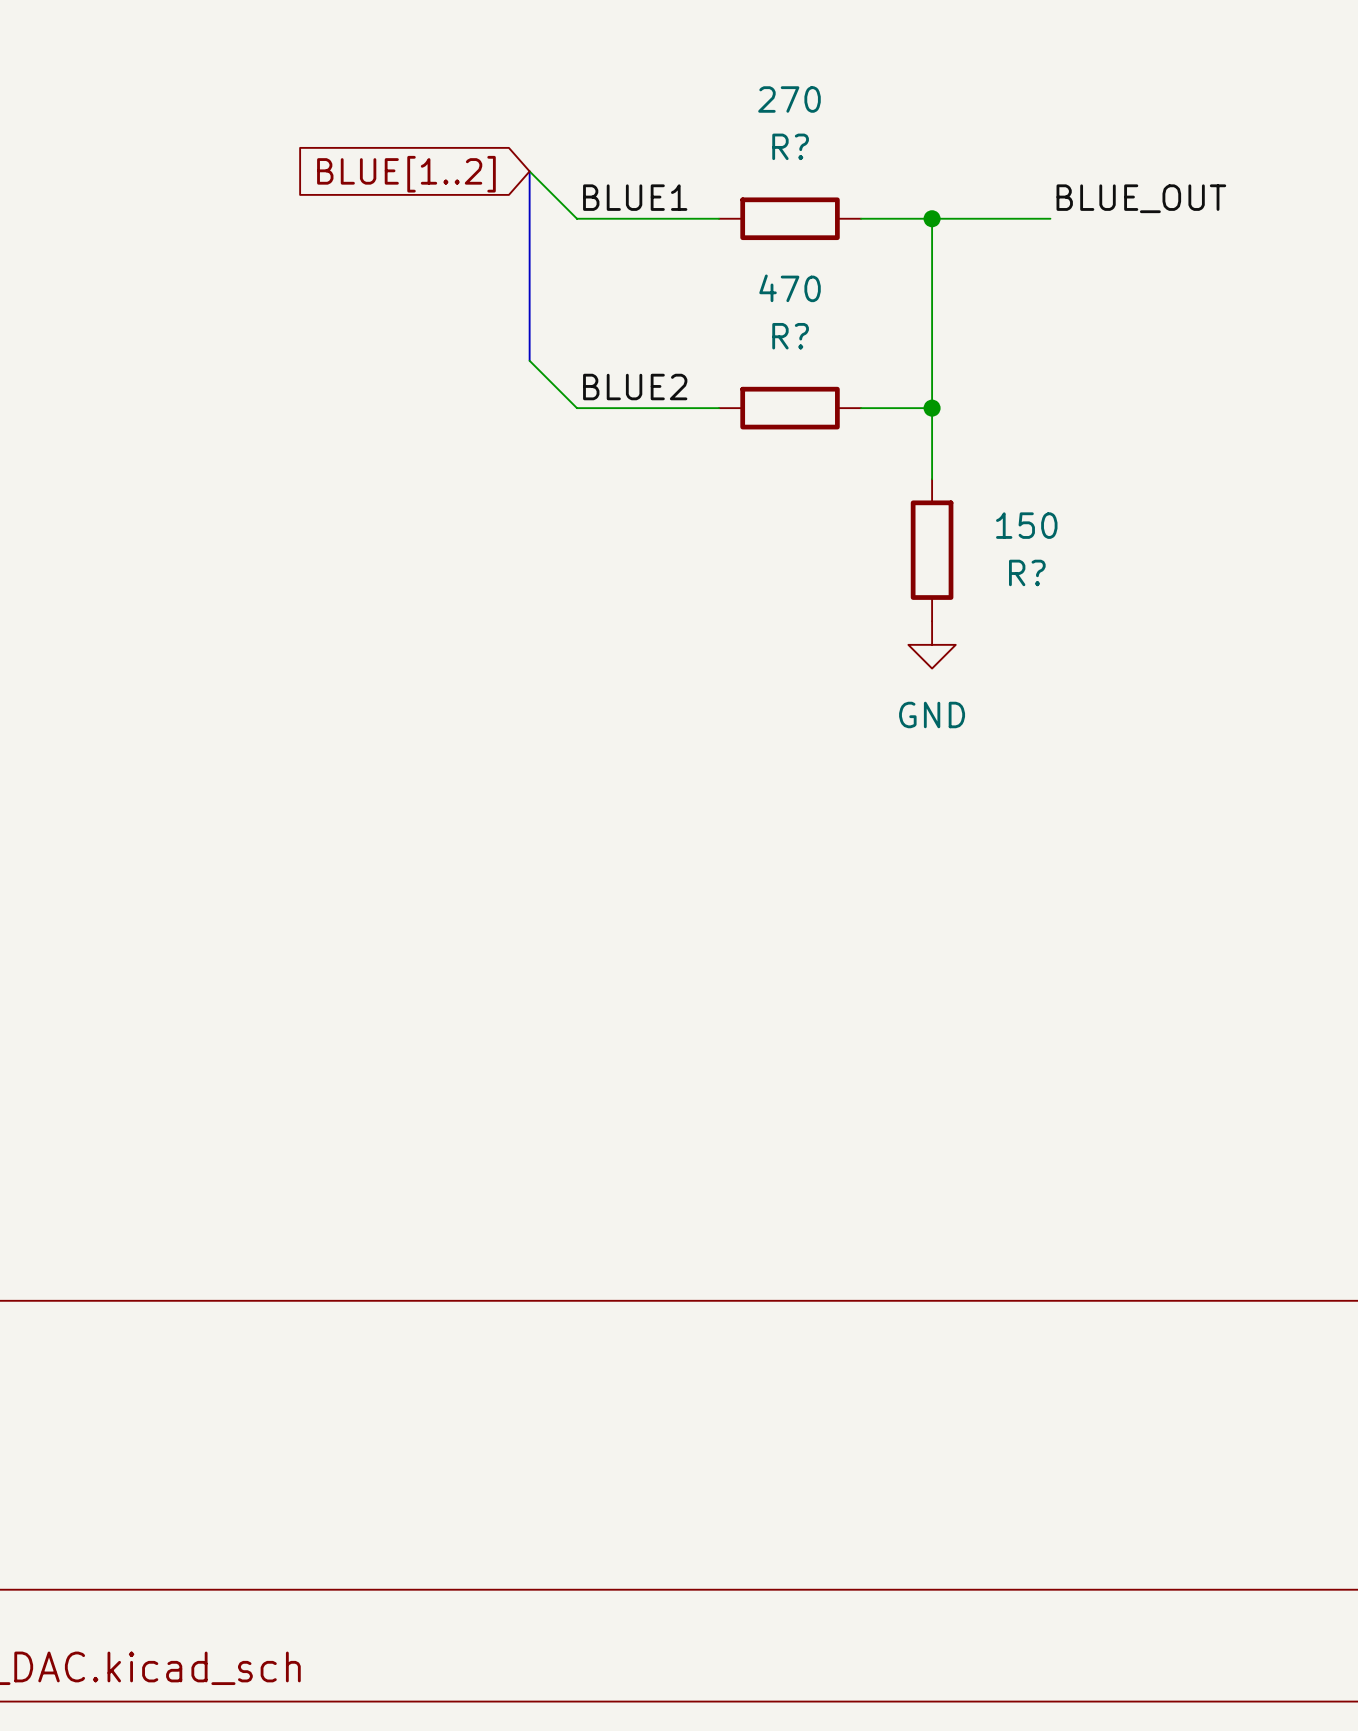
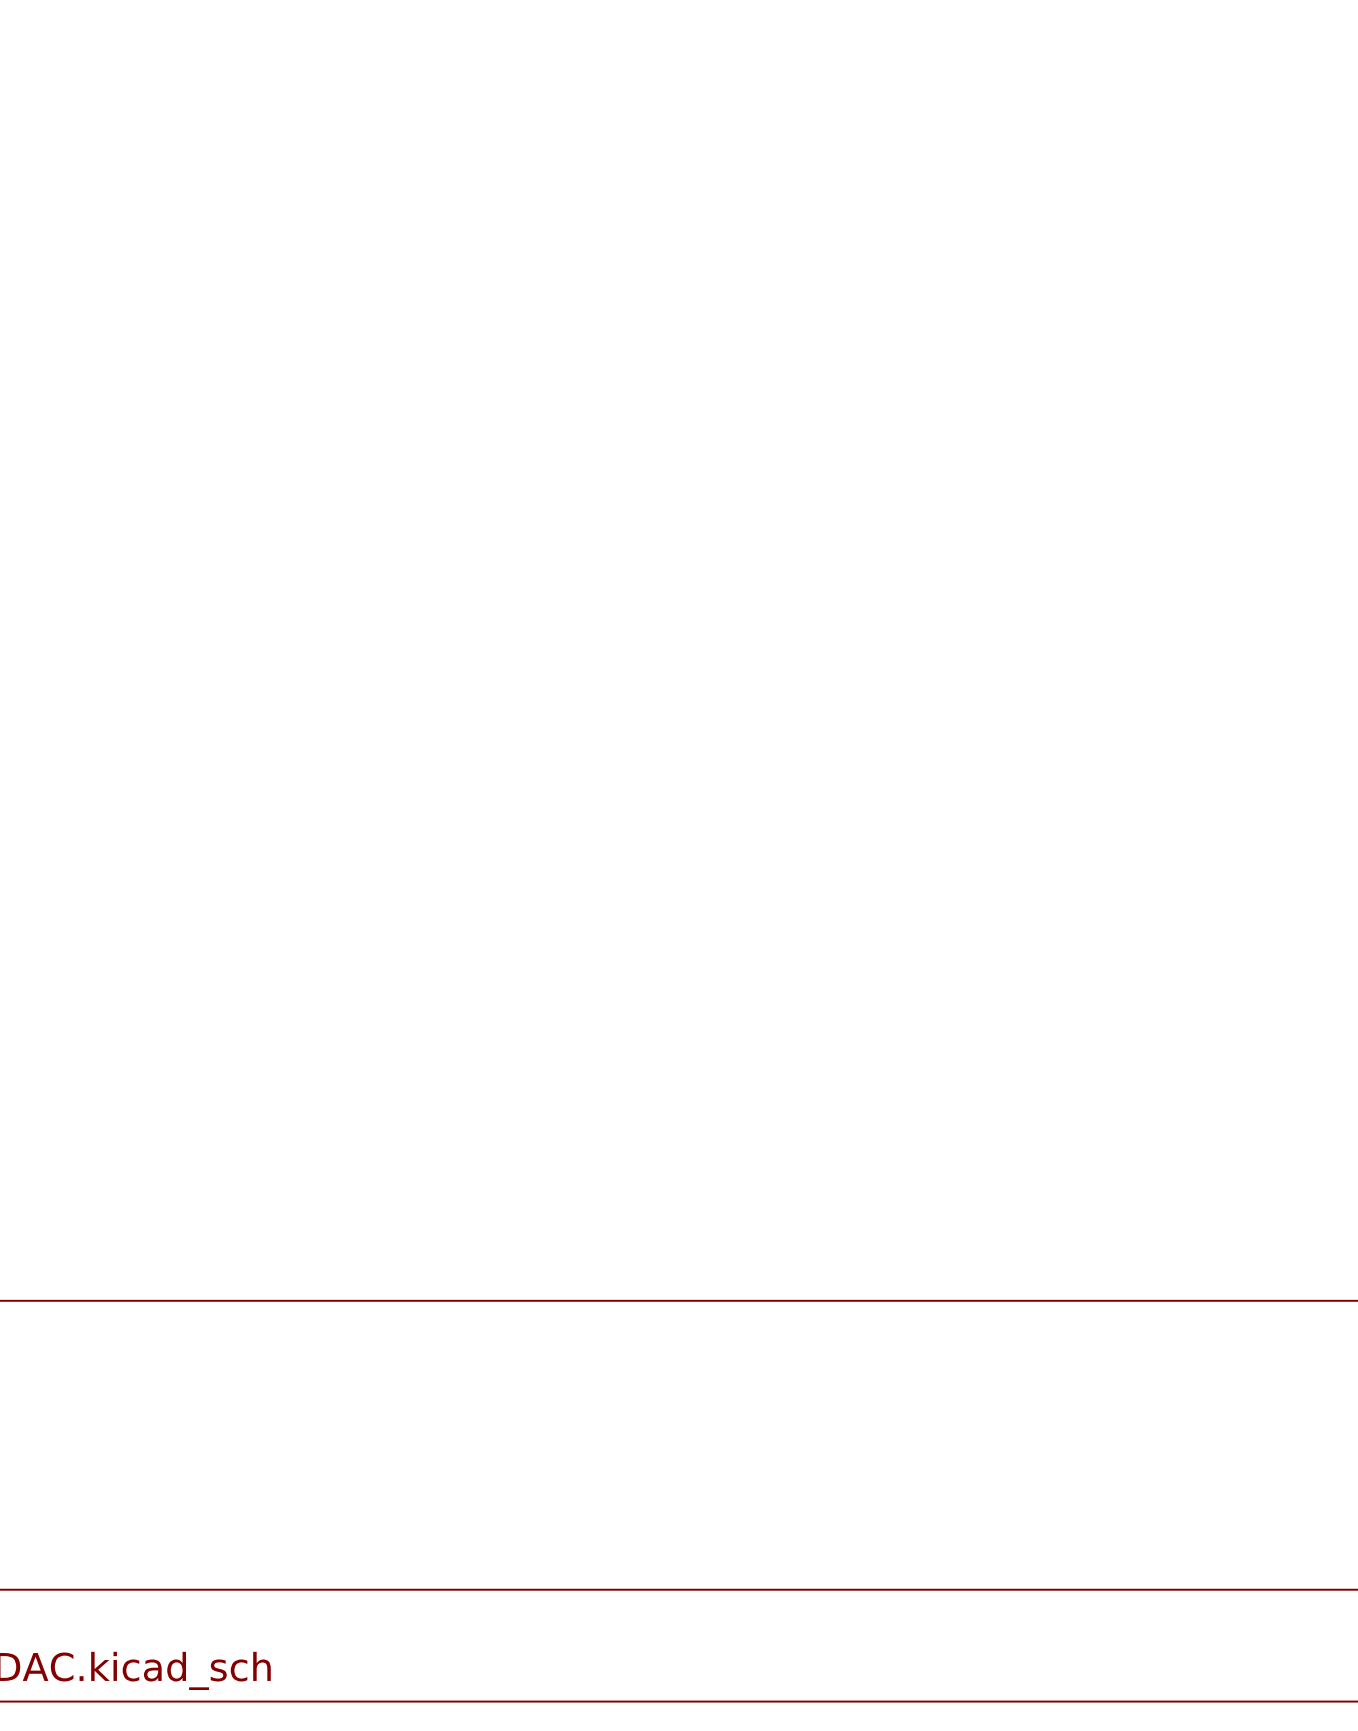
wire: (529, 171) (576, 218) (719, 218) -> none
bus: (529, 171) (529, 360) -> none
global label: BLUE[1..2] (406, 174) -> none
label: BLUE1 (635, 197) -> none
label: BLUE_OUT (1141, 198) -> none
R?: 270 (790, 218) -> none
wire: (861, 218) (1050, 218) -> none
wire: (932, 218) (932, 479) -> none
junction: (932, 218) -> none
wire: (529, 360) (576, 408) (719, 408) -> none
label: BLUE2 (635, 387) -> none
R?: 470 (790, 408) -> none
wire: (861, 408) (932, 408) -> none
junction: (932, 408) -> none
R?: 150 (932, 550) -> none
power symbol: GND (932, 644) -> none

